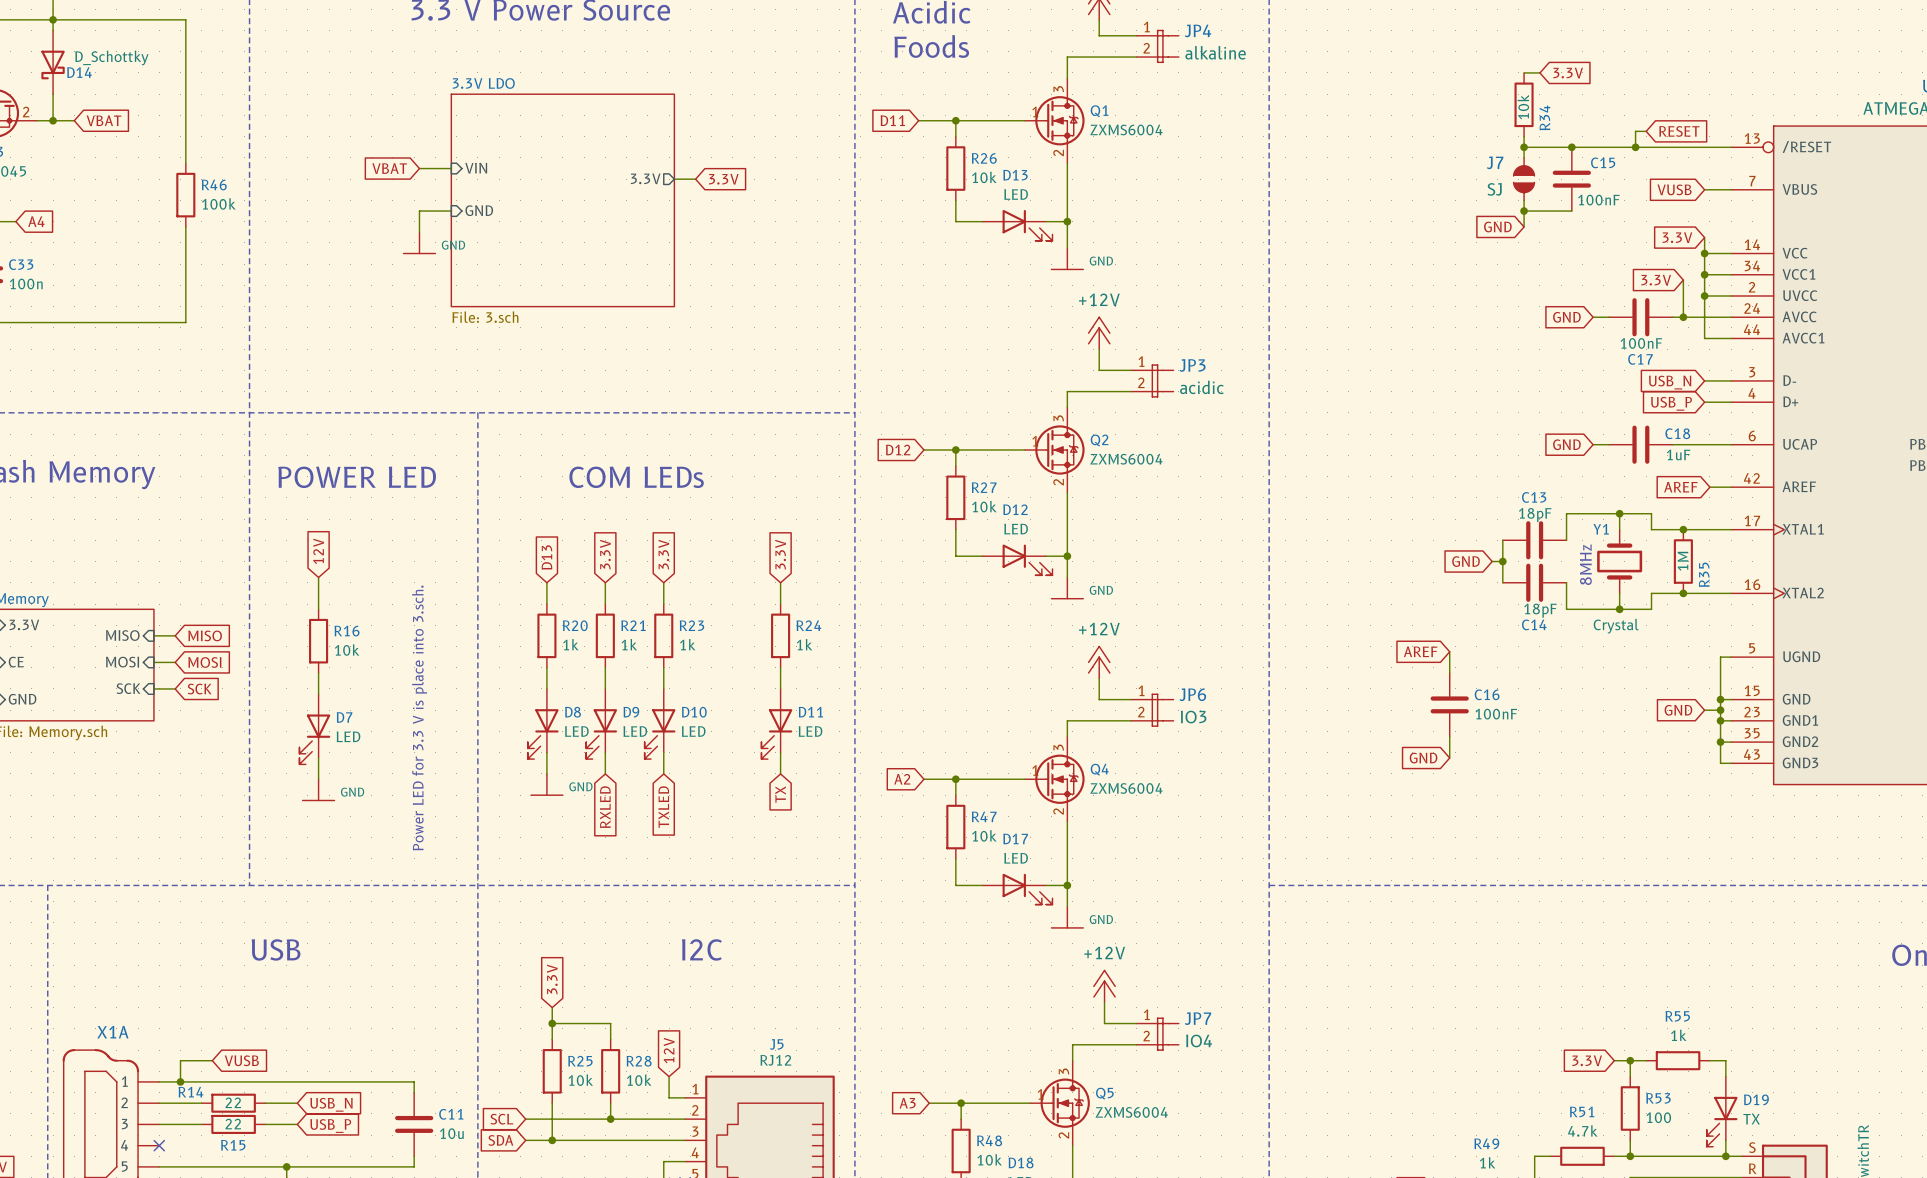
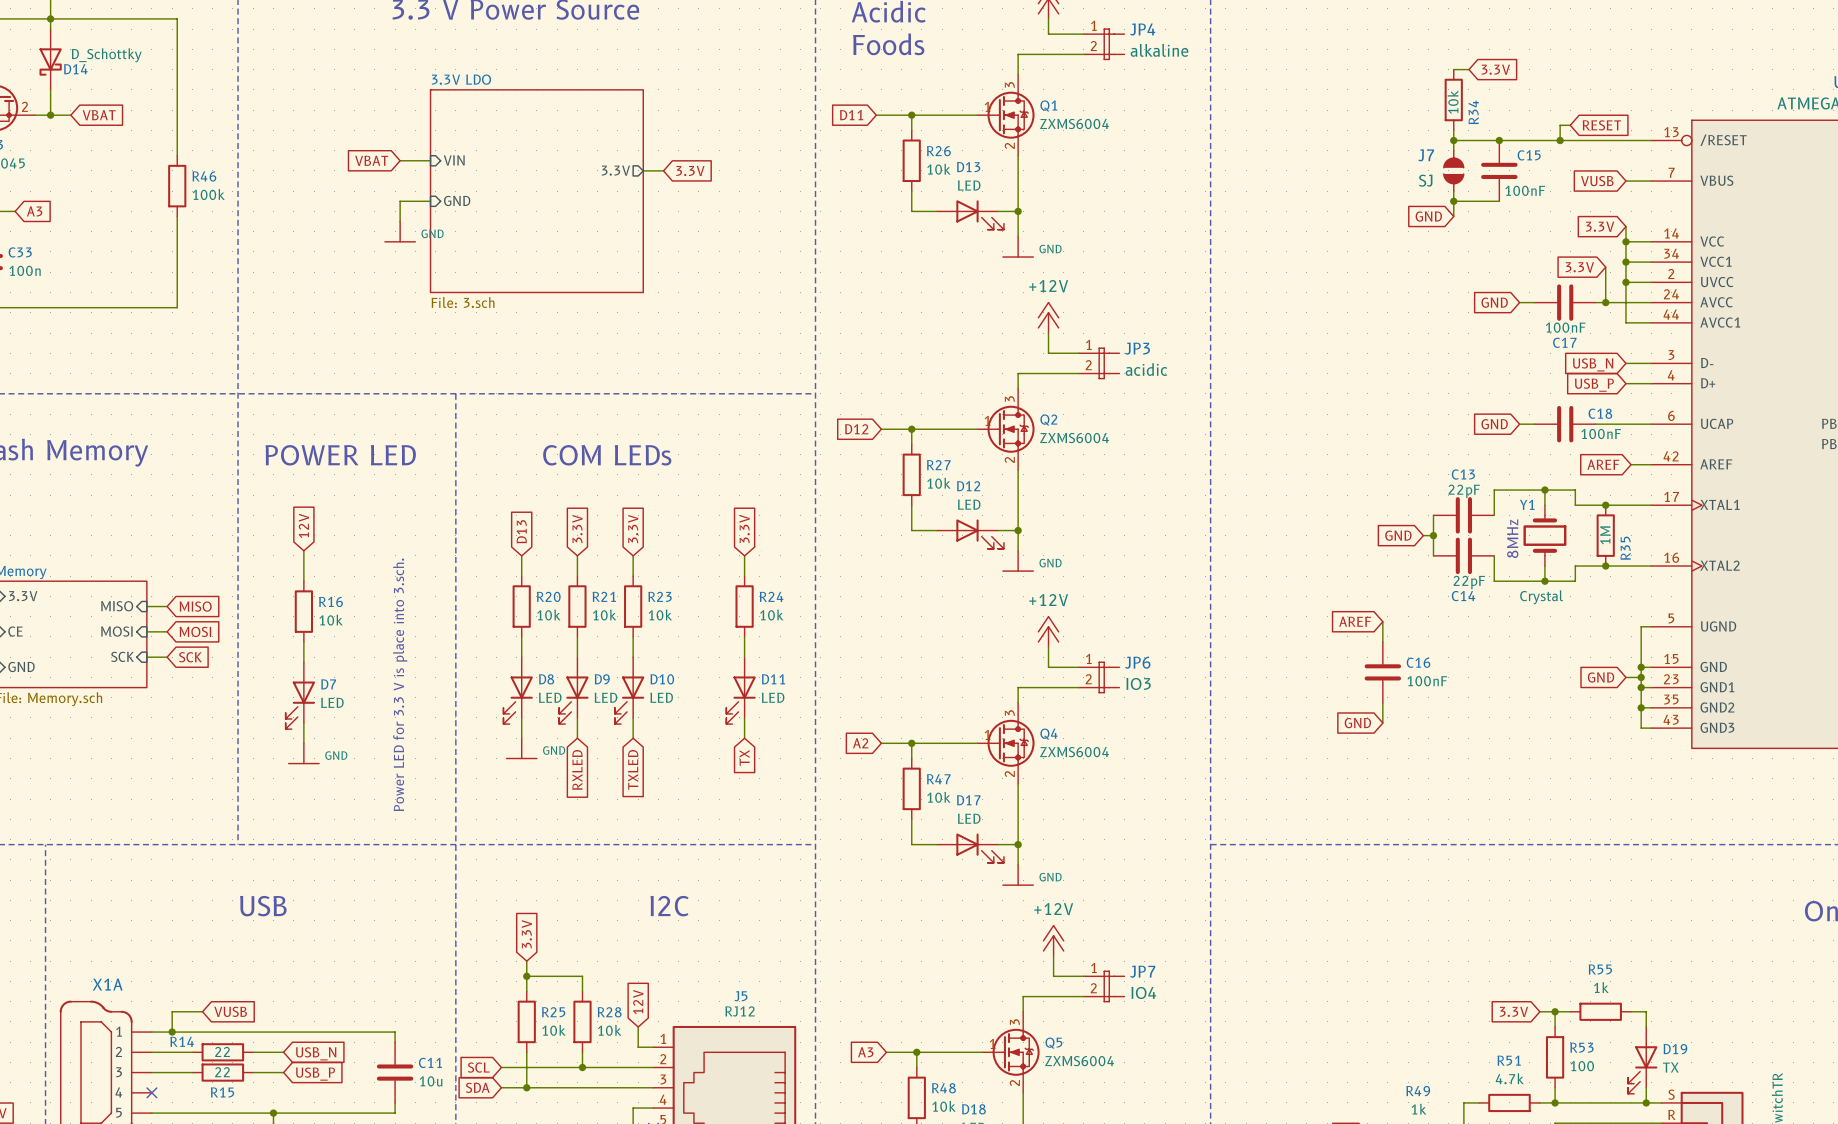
global label: A4 (36, 221) -> A3 (34, 211)
C18 value: 1uF (1678, 454) -> 100nF (1601, 433)
C13 value: 18pF (1535, 515) -> 22pF (1464, 491)
C14 value: 18pF (1540, 610) -> 22pF (1469, 582)
R20 value: 1k (570, 644) -> 10k (548, 615)
R21 value: 1k (629, 644) -> 10k (604, 615)
R23 value: 1k (687, 644) -> 10k (660, 615)
R24 value: 1k (804, 644) -> 10k (771, 615)

